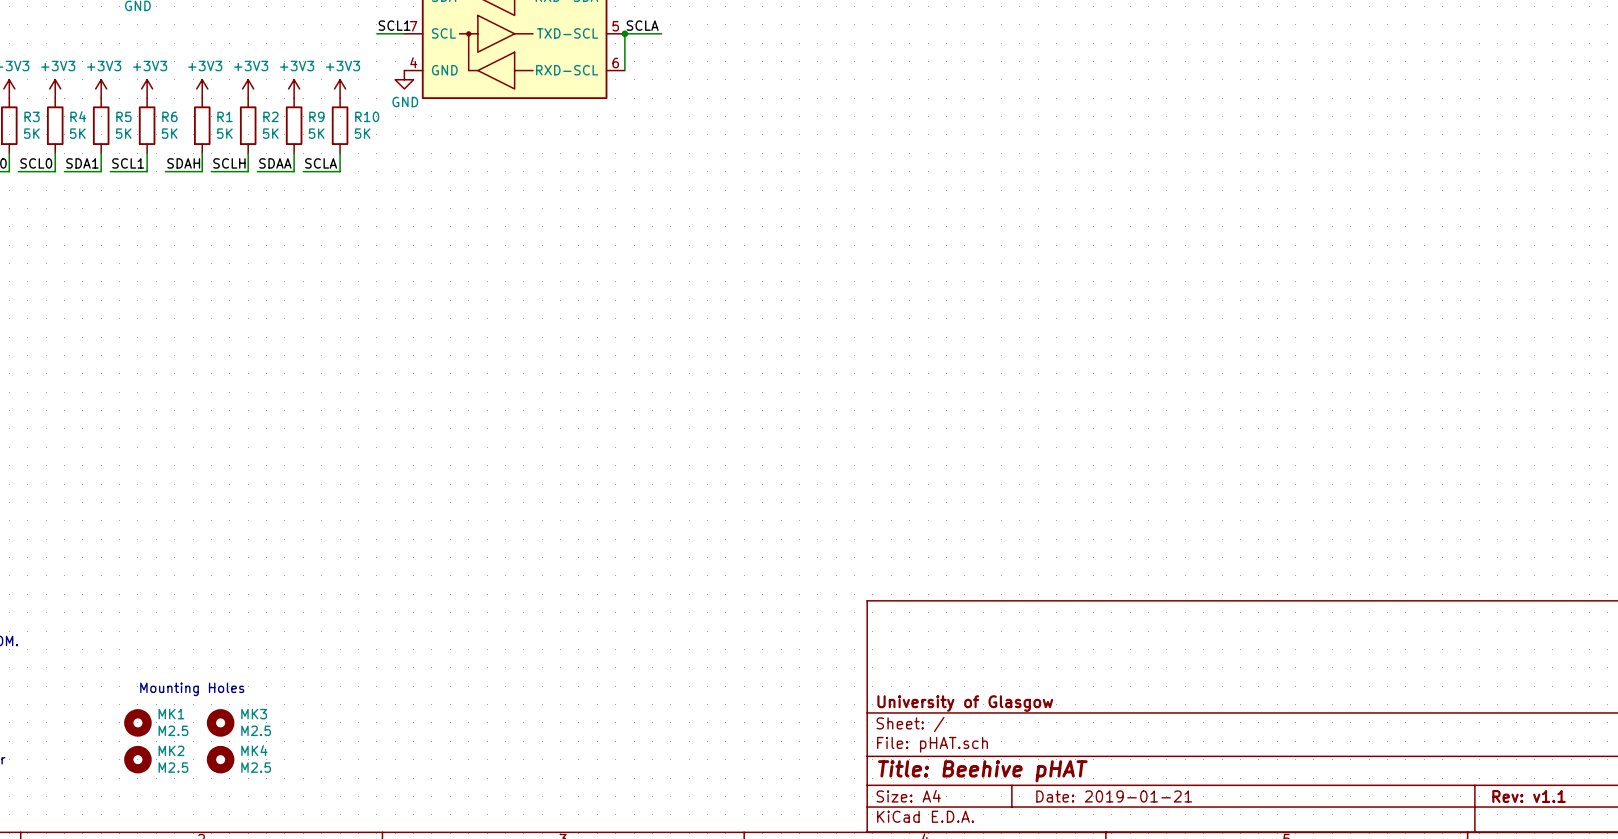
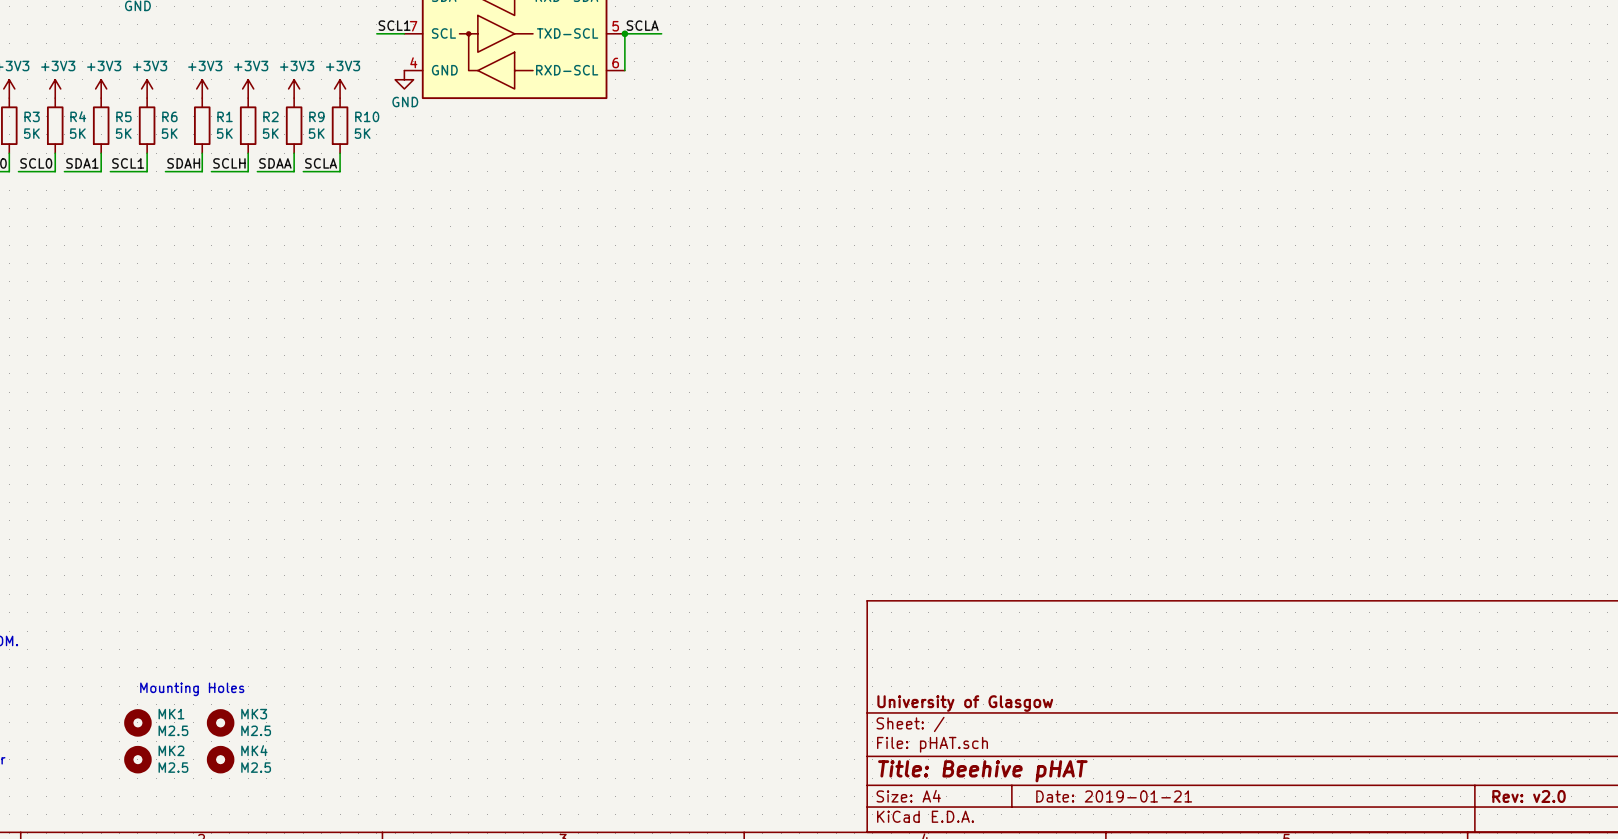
title block: Rev: v1.1 (1529, 796) -> Rev: v2.0 (1529, 796)

